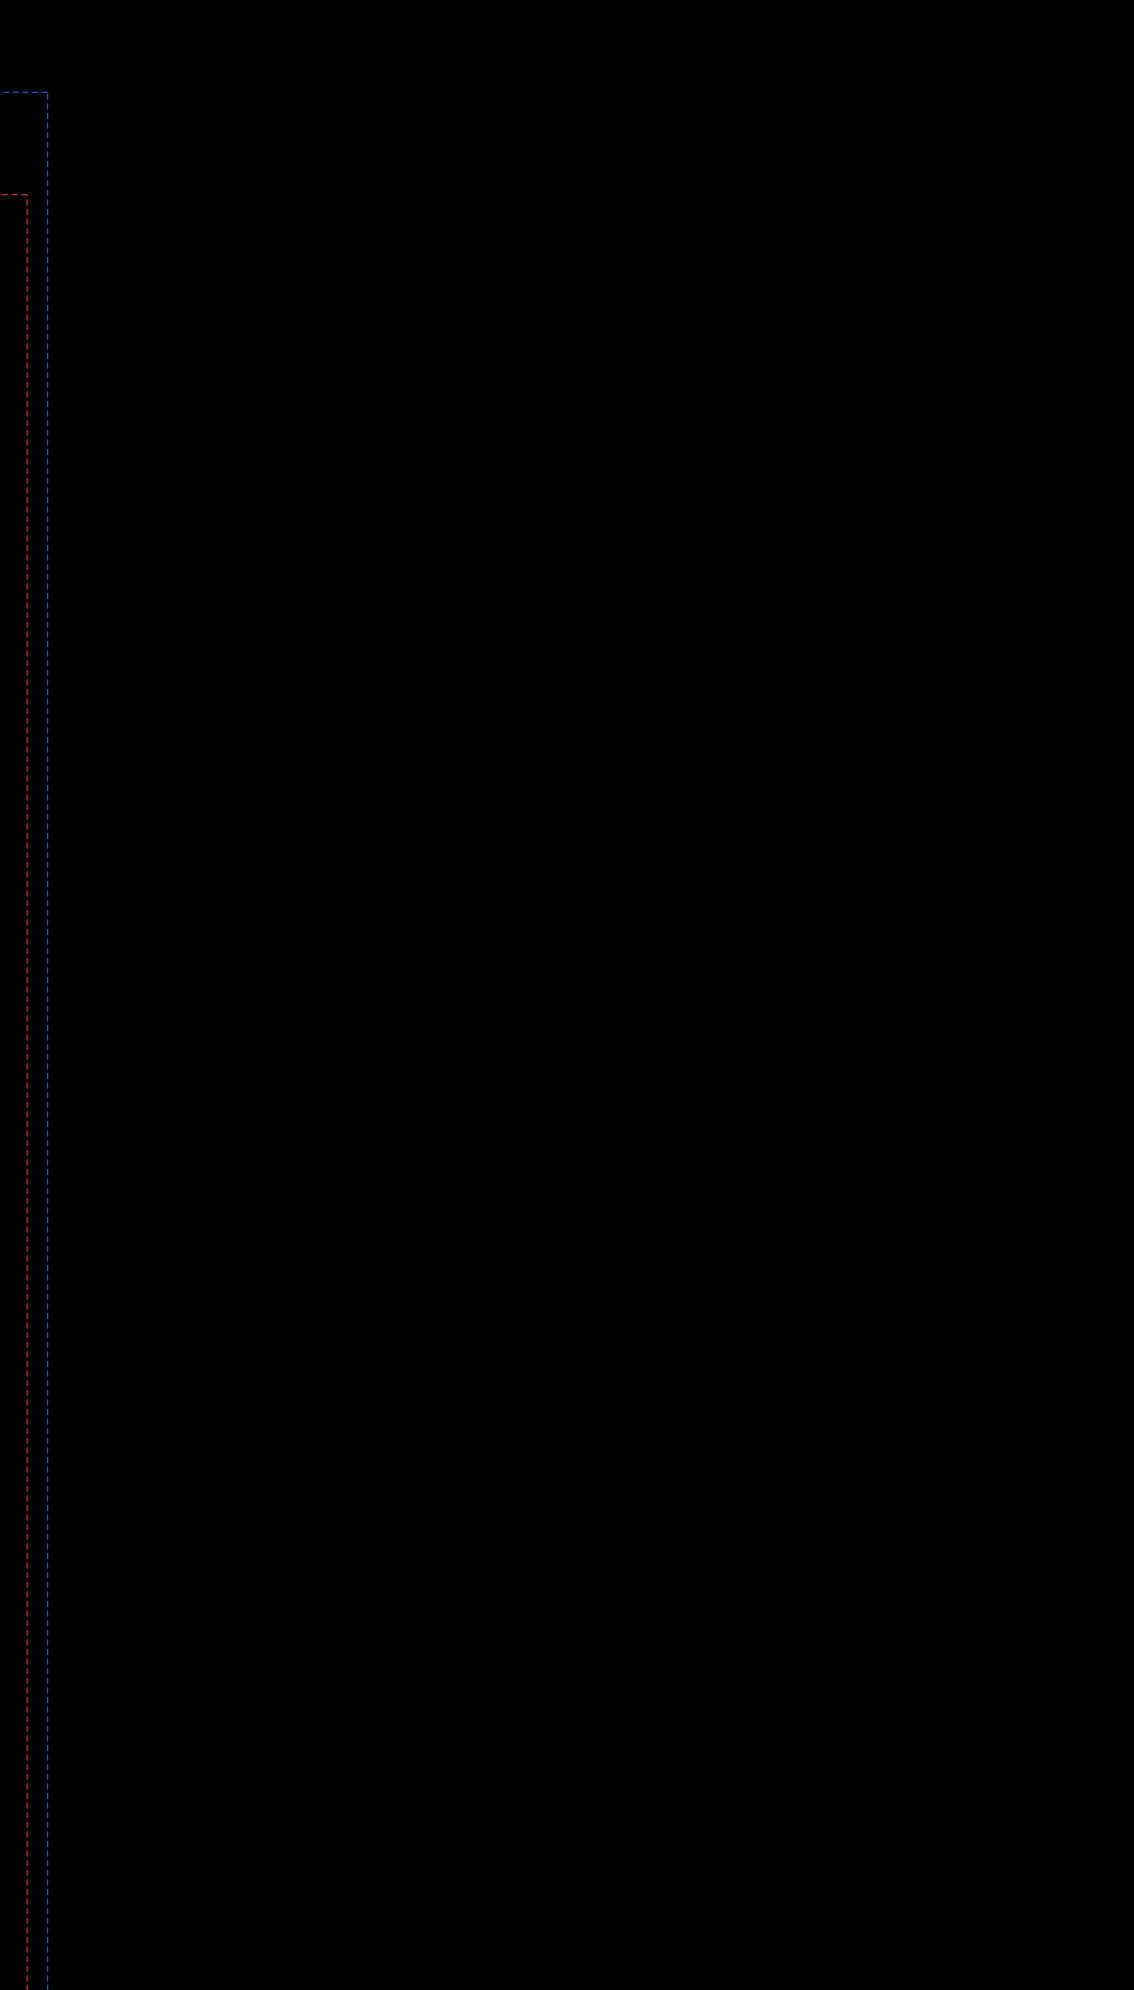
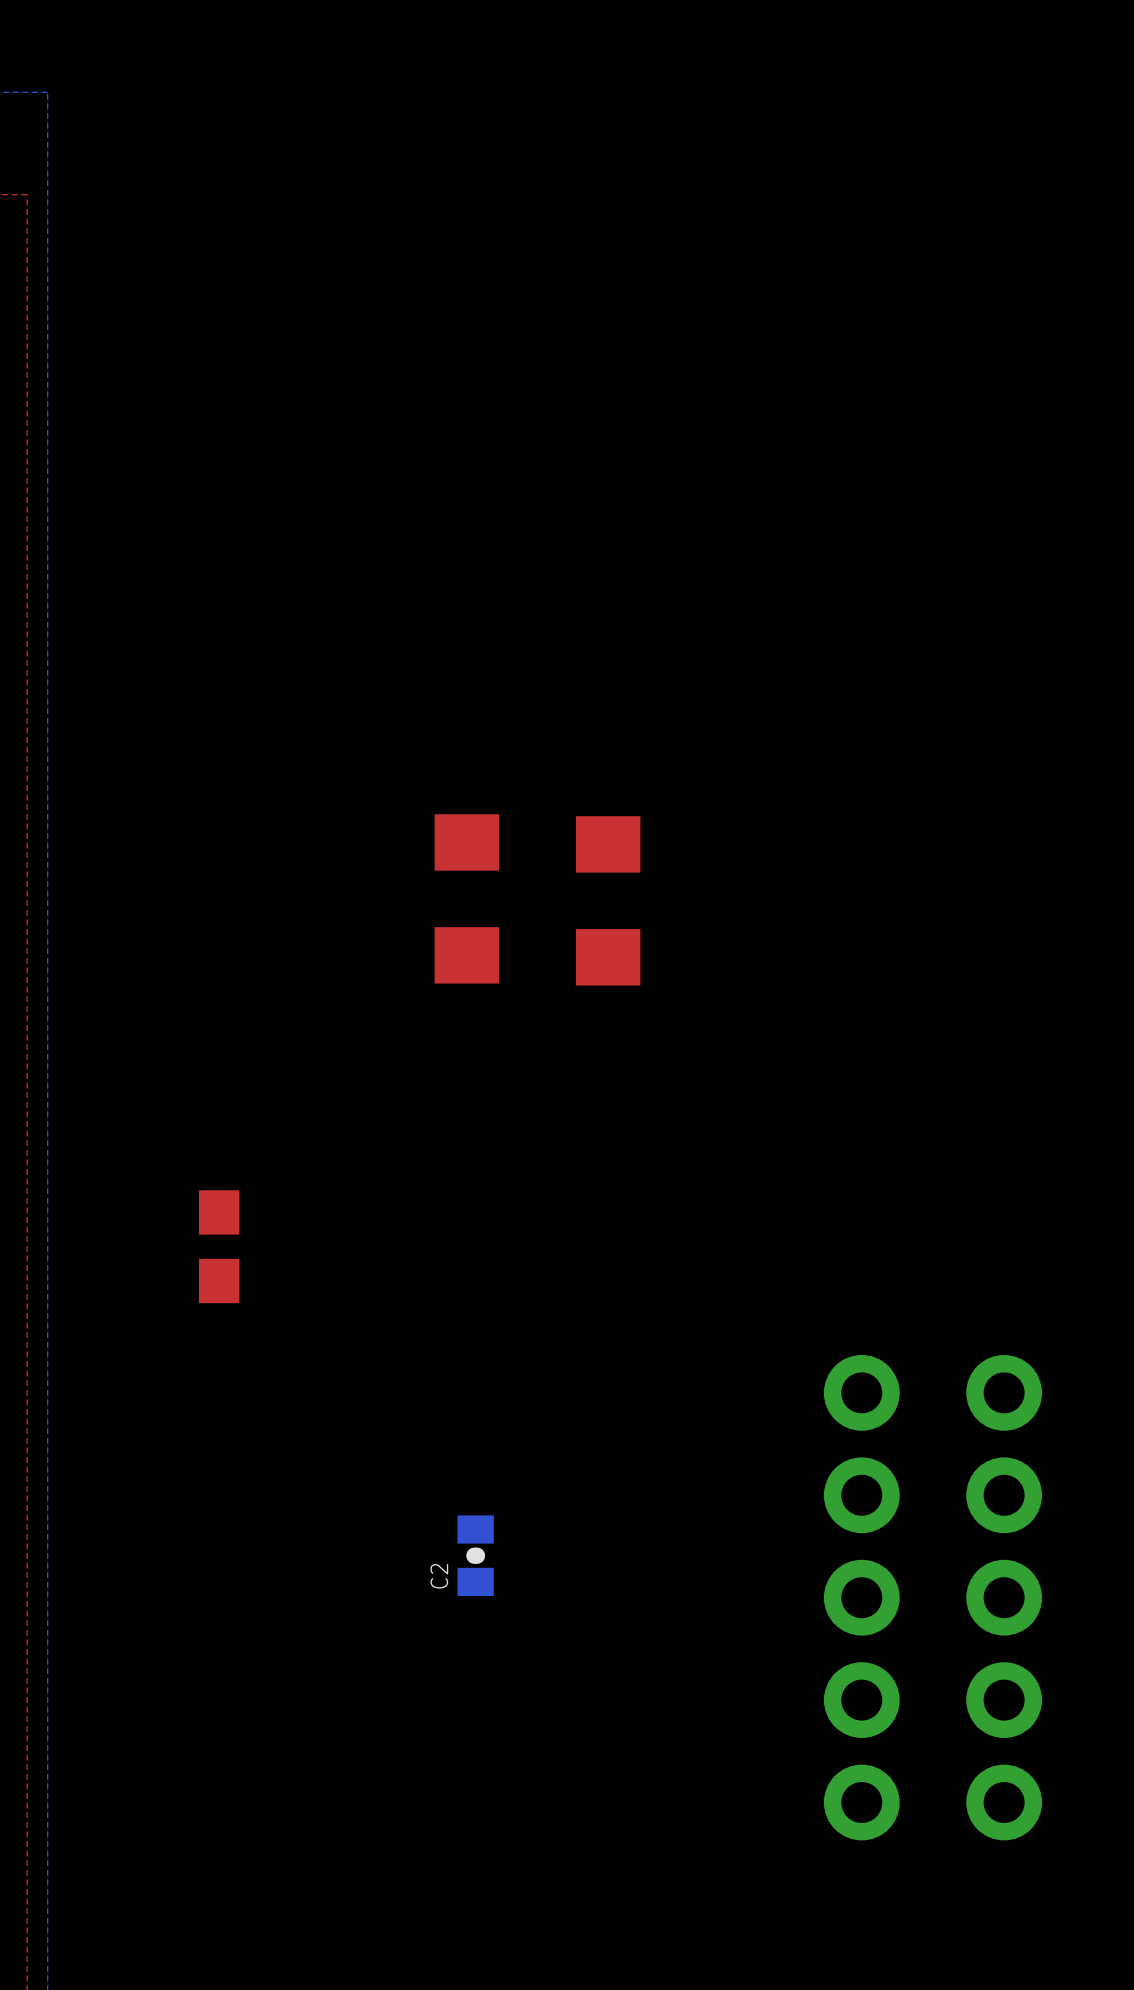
part: none -> (466, 898)
part: none -> (608, 900)
part: none -> (219, 1246)
C2: none -> (475, 1555)
part: none -> (861, 1597)
part: none -> (1004, 1597)

